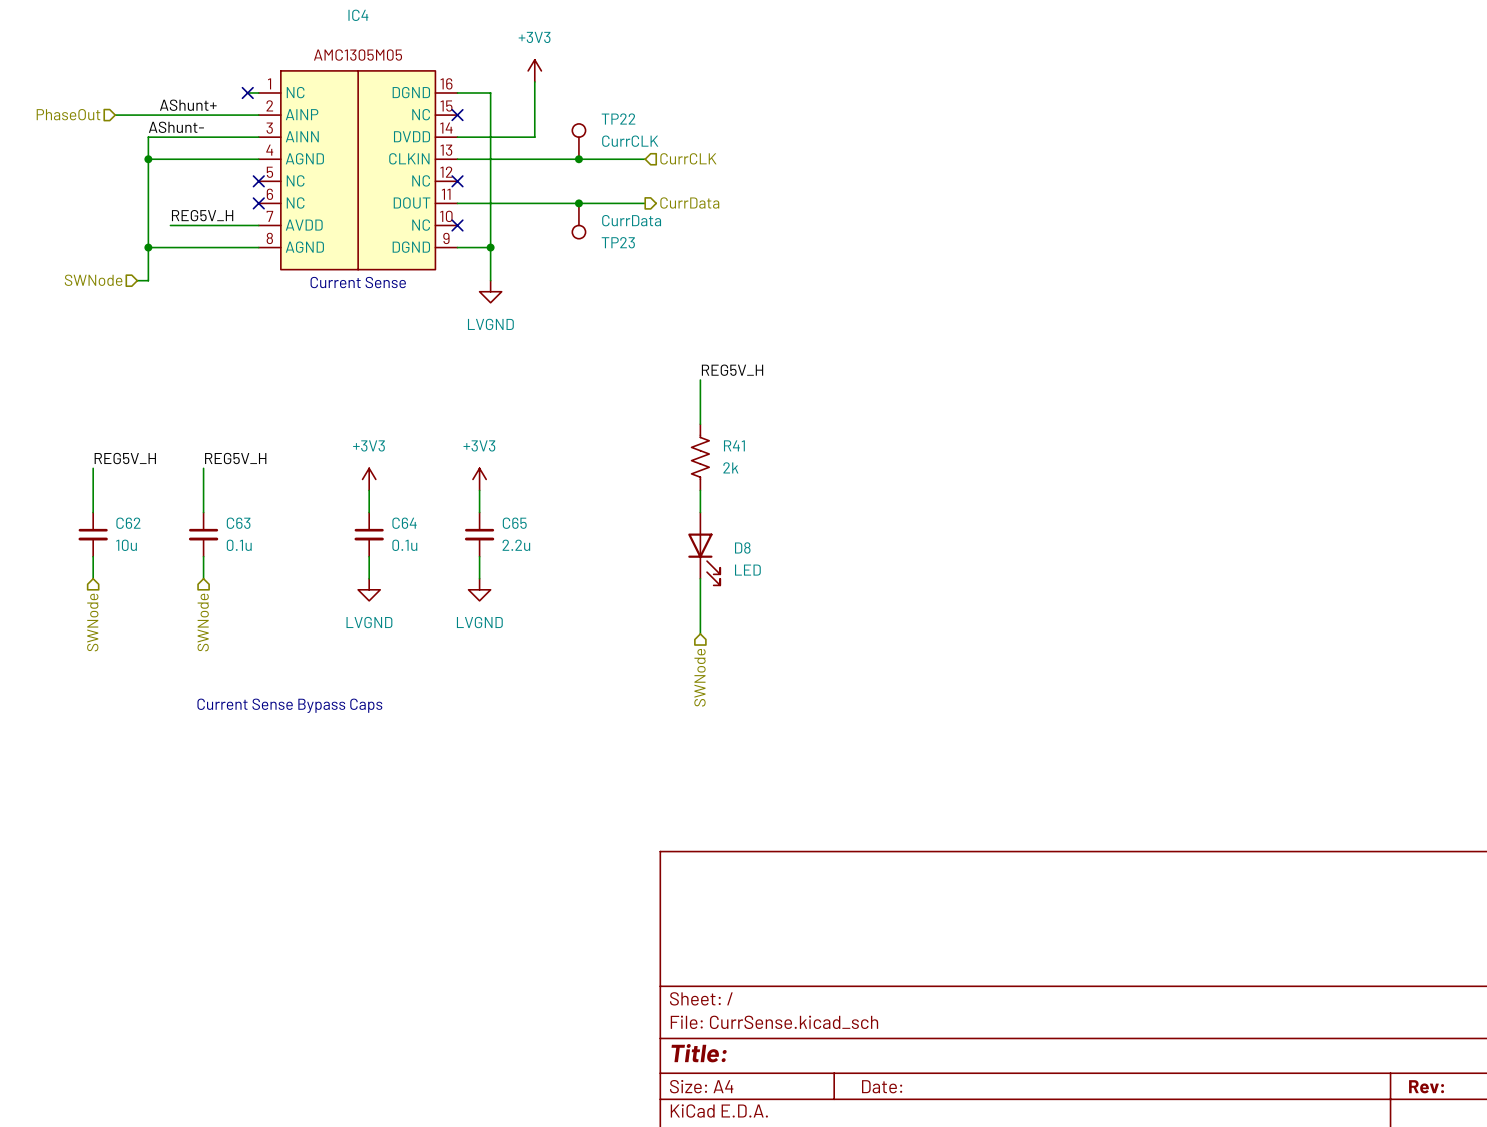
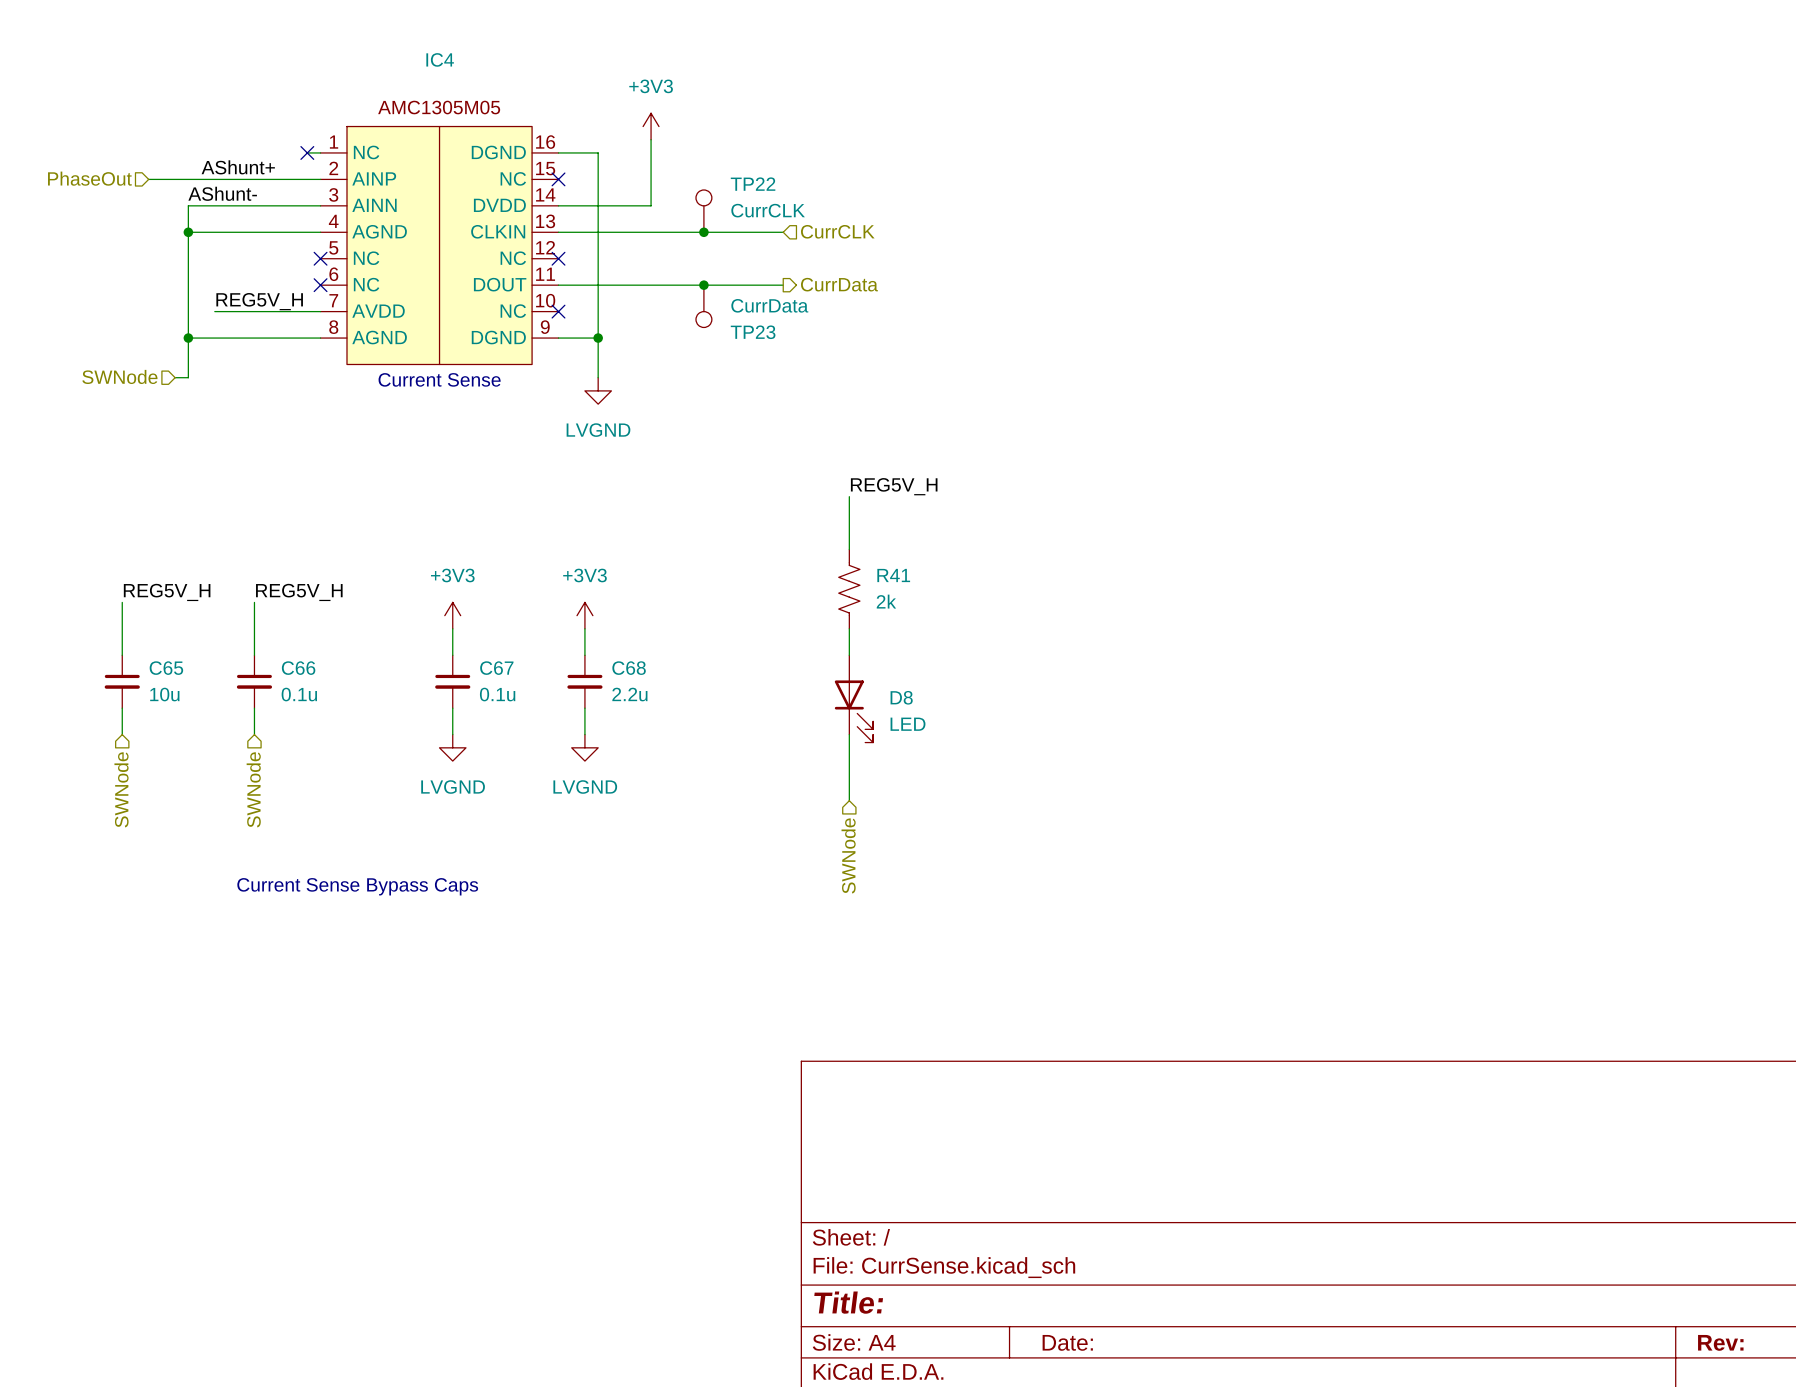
C62 name: C62 (128, 523) -> C65 (166, 668)
C63 name: C63 (238, 523) -> C66 (298, 668)
C64 name: C64 (404, 523) -> C67 (496, 668)
C65 name: C65 (514, 523) -> C68 (629, 668)

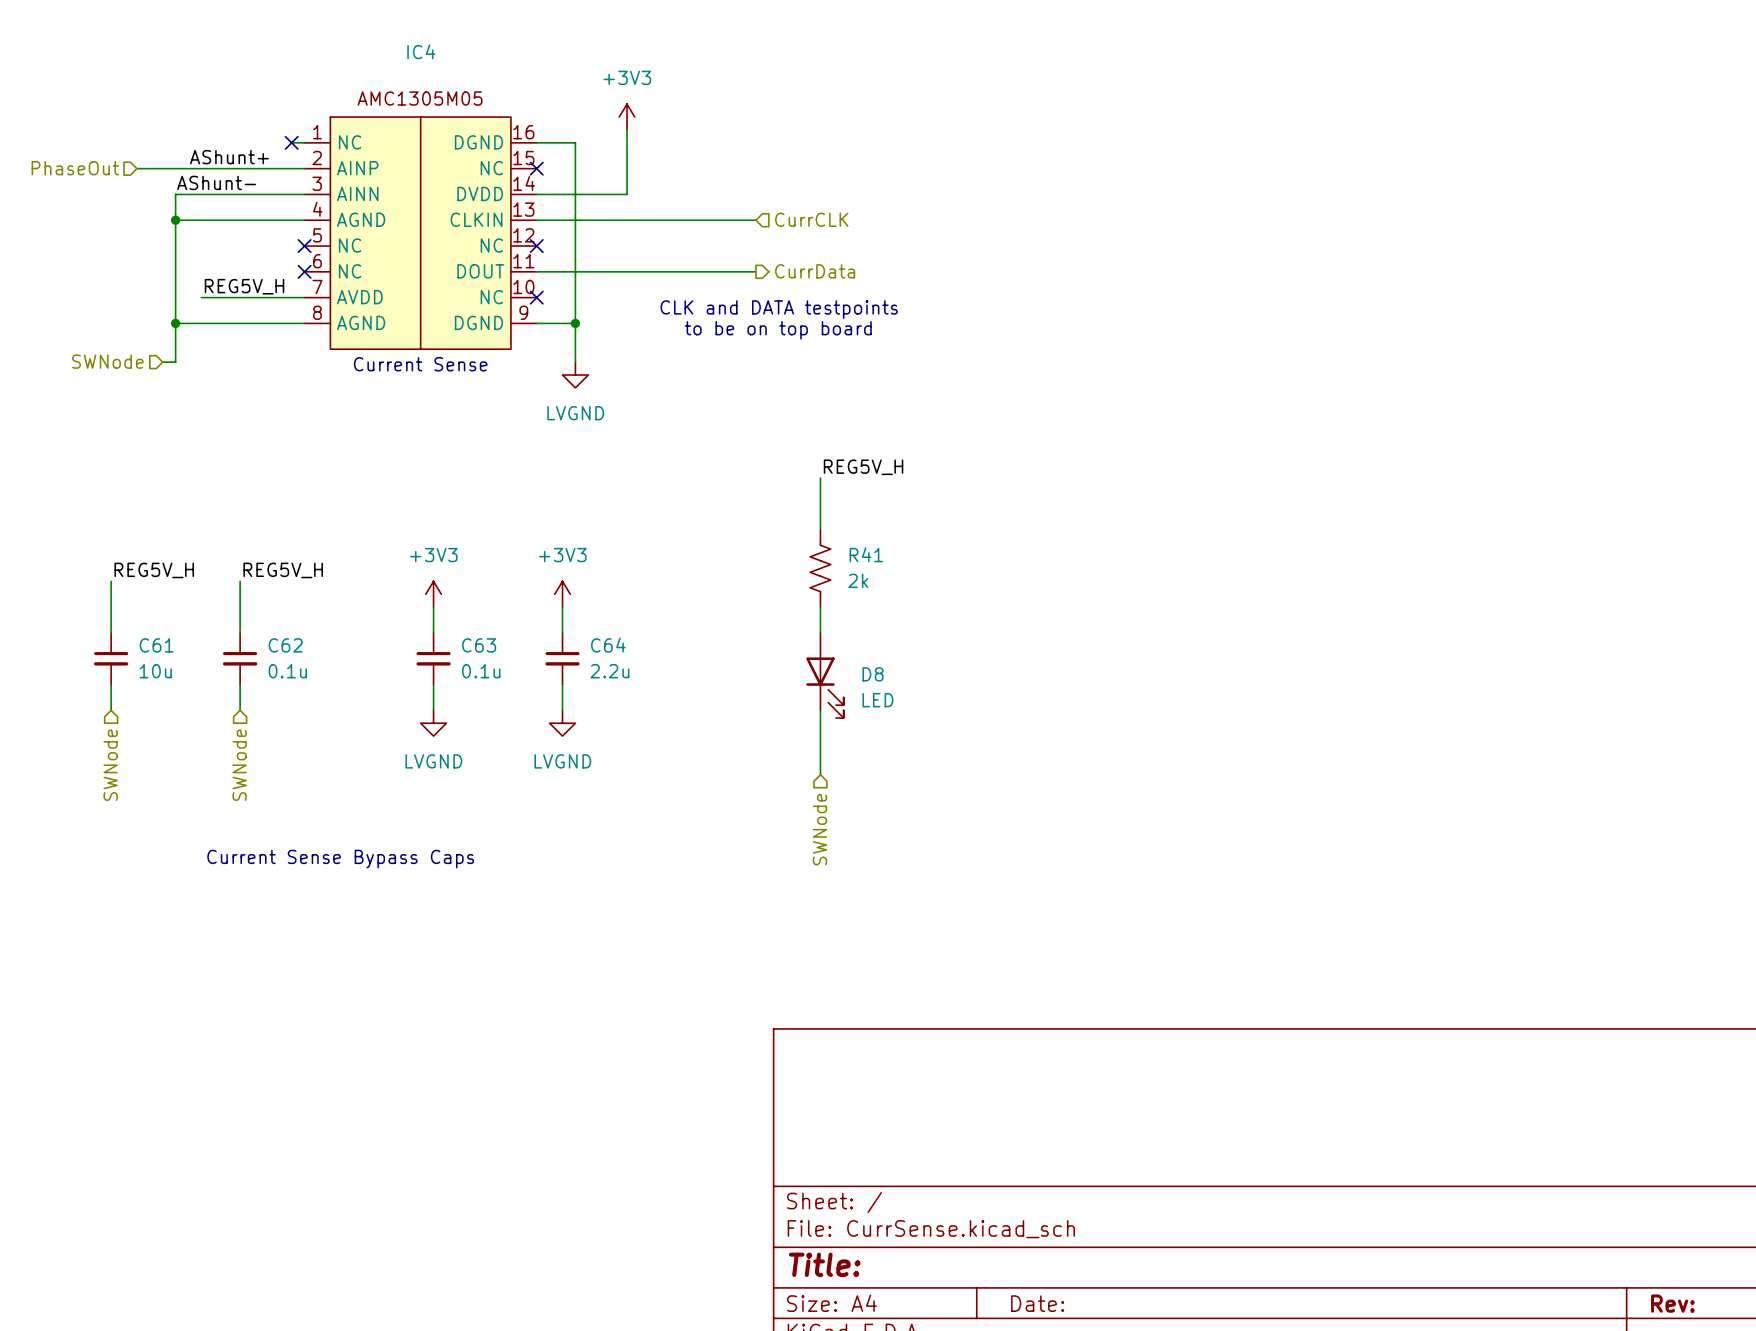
TP22: CurrCLK (703, 211) -> none
junction: (703, 232) -> none
junction: (703, 285) -> none
TP23: CurrData (703, 306) -> none
text: none -> CLK and DATA testpoints (779, 309)
text: none -> to be on top board (778, 330)
C65 name: C65 (166, 668) -> C61 (156, 645)
C66 name: C66 (298, 668) -> C62 (285, 645)
C67 name: C67 (496, 668) -> C63 (479, 645)
C68 name: C68 (629, 668) -> C64 (608, 645)

